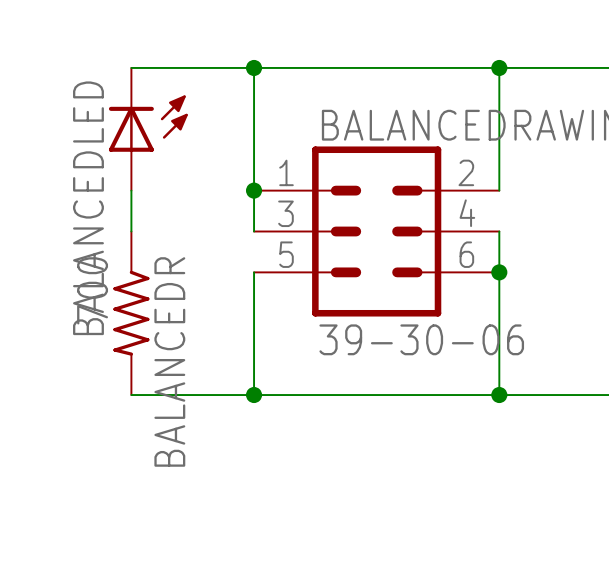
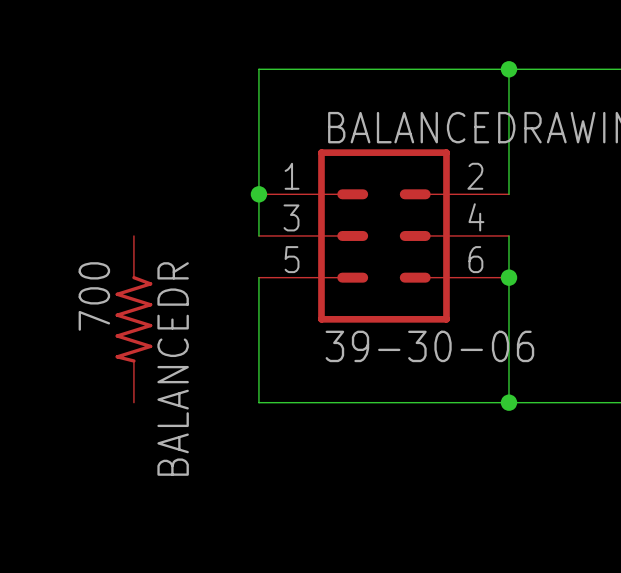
wire: (131, 67) (254, 67) -> none
junction: (254, 67) -> none
BALANCEDLED: (148, 129) -> none
wire: (131, 190) (131, 231) -> none
wire: (131, 395) (254, 395) -> none
junction: (254, 395) -> none

